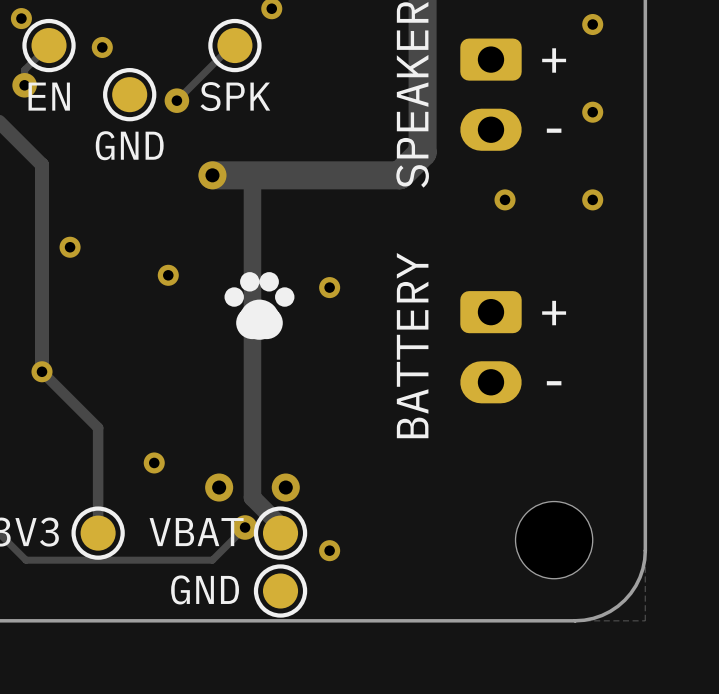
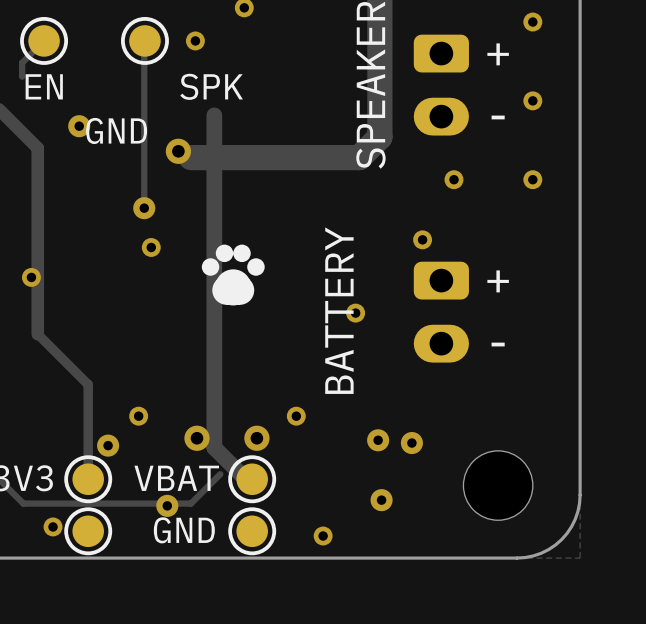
via: (21, 18) -> none
track: none -> (144, 40) (144, 208)
part: none -> (144, 40)
via: none -> (195, 40)
track: (234, 45) (232, 45) (176, 100) -> none
part: (234, 45) -> none
via: (102, 47) -> none
via: (24, 85) -> none
part: (129, 94) -> none
via: (176, 100) -> none
via: none -> (79, 126)
via position: (212, 175) -> (178, 151)
track: (252, 175) (252, 497) (280, 525) (280, 533) -> (214, 115) (214, 447) (245, 479) (252, 479)
via: none -> (144, 208)
via: (70, 247) -> none
via: none -> (422, 239)
via: (329, 287) -> none
via: none -> (31, 277)
text position: BATTERY (412, 345) -> BATTERY (339, 310)
via: none -> (355, 313)
via: (42, 371) -> none
via: none -> (296, 416)
via: none -> (378, 440)
via: none -> (411, 443)
via: none -> (108, 445)
via: (245, 527) -> none
via: (329, 550) -> none
via: none -> (381, 500)
via: none -> (167, 505)
via: none -> (53, 526)
part: none -> (88, 531)
via: none -> (323, 536)

